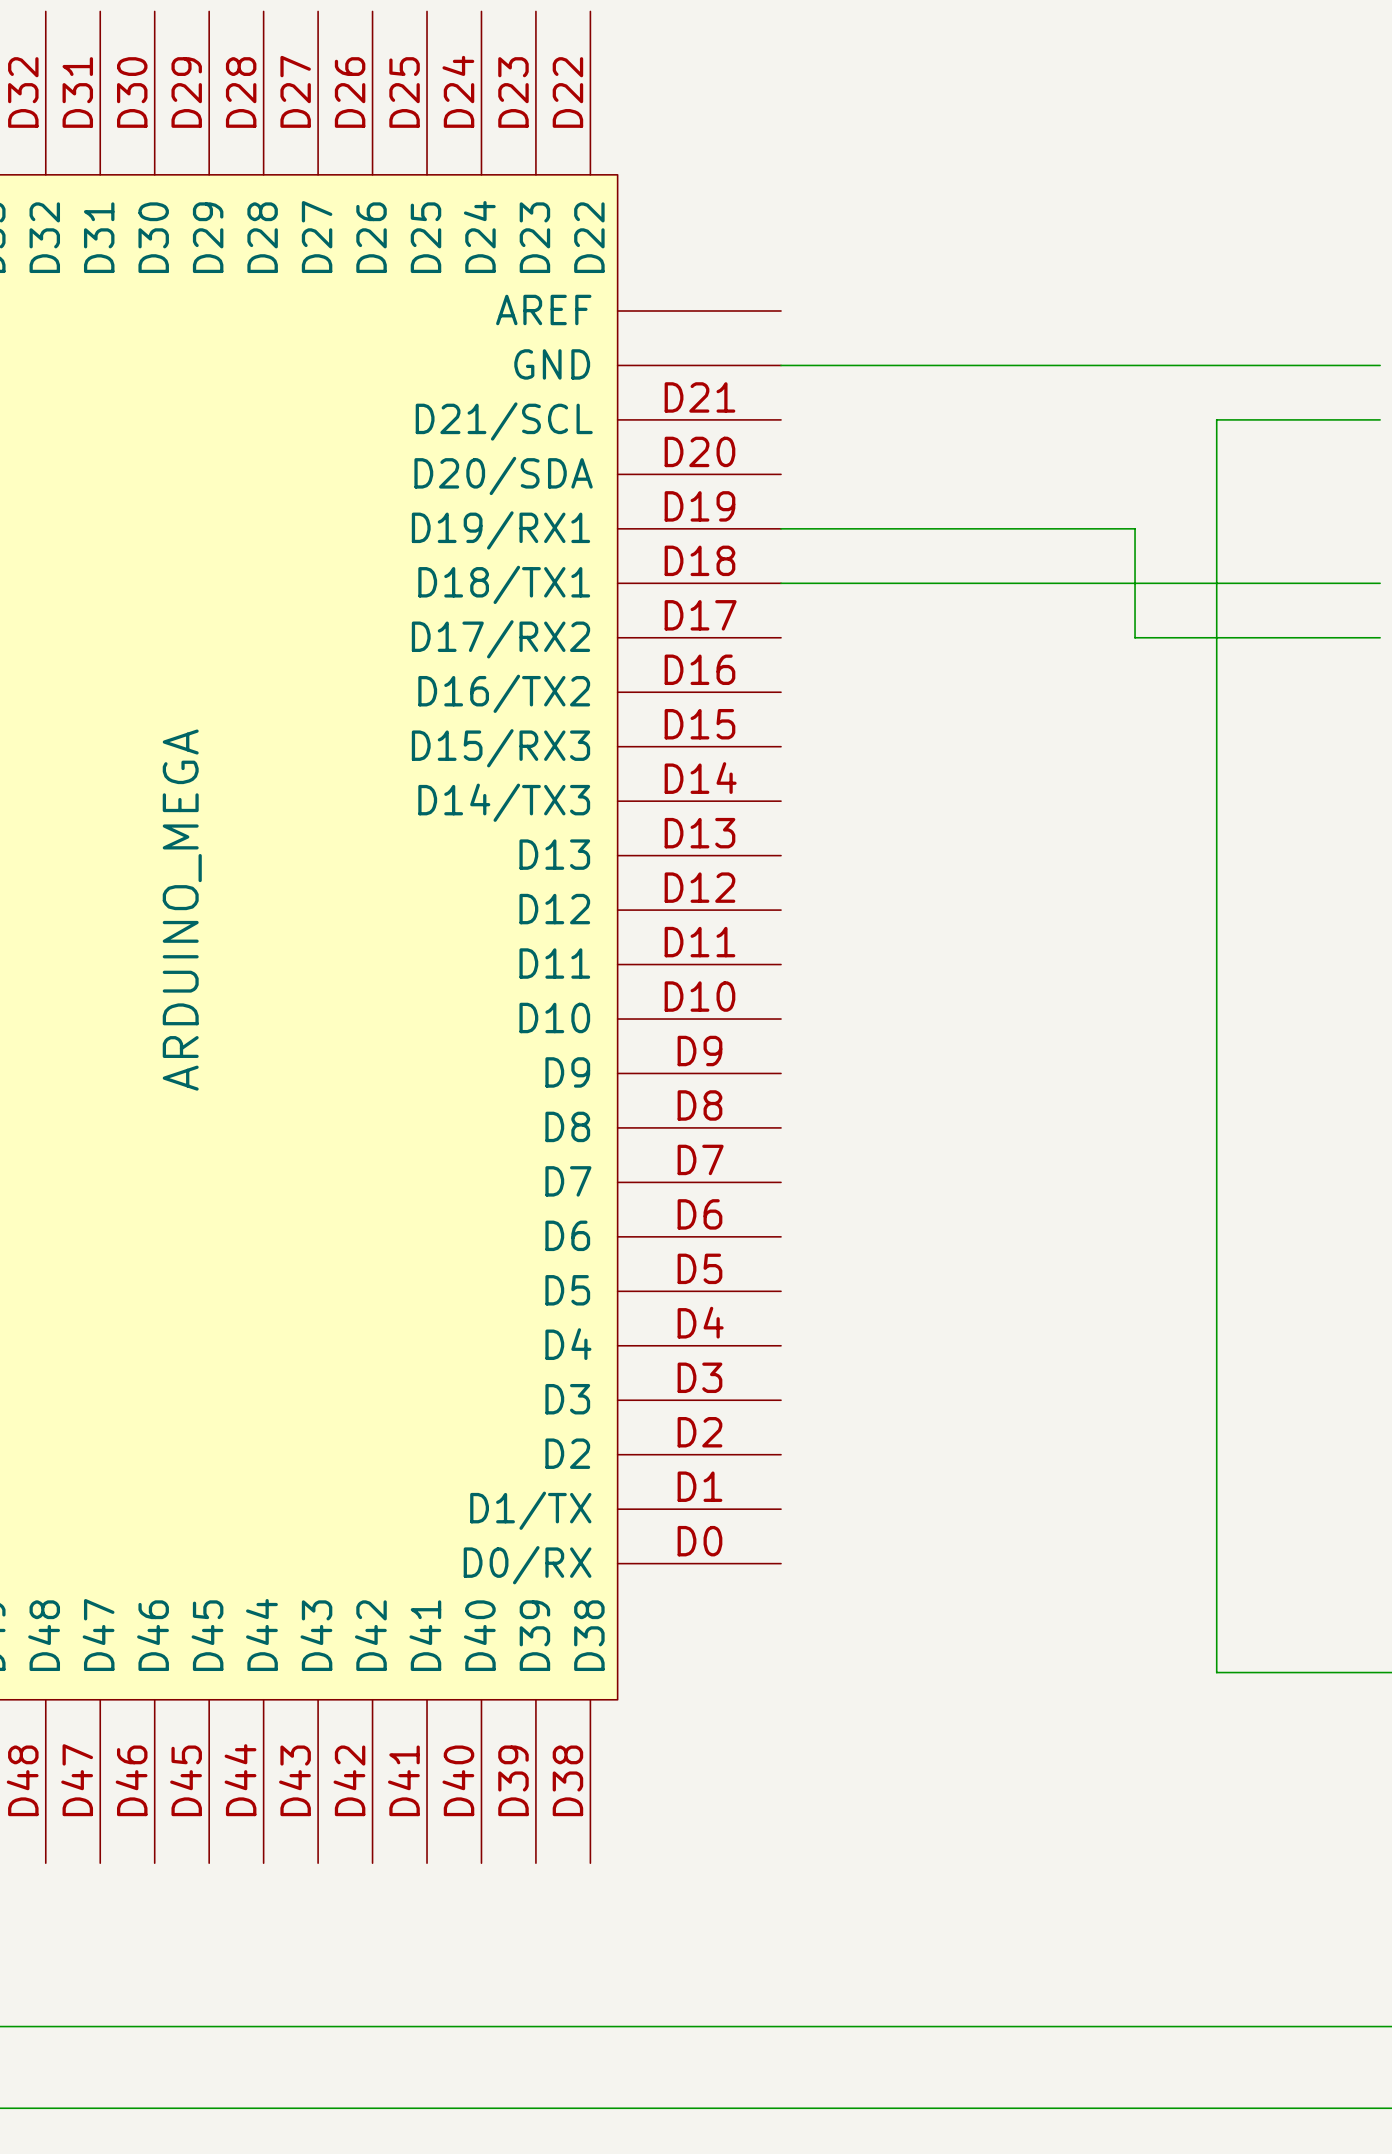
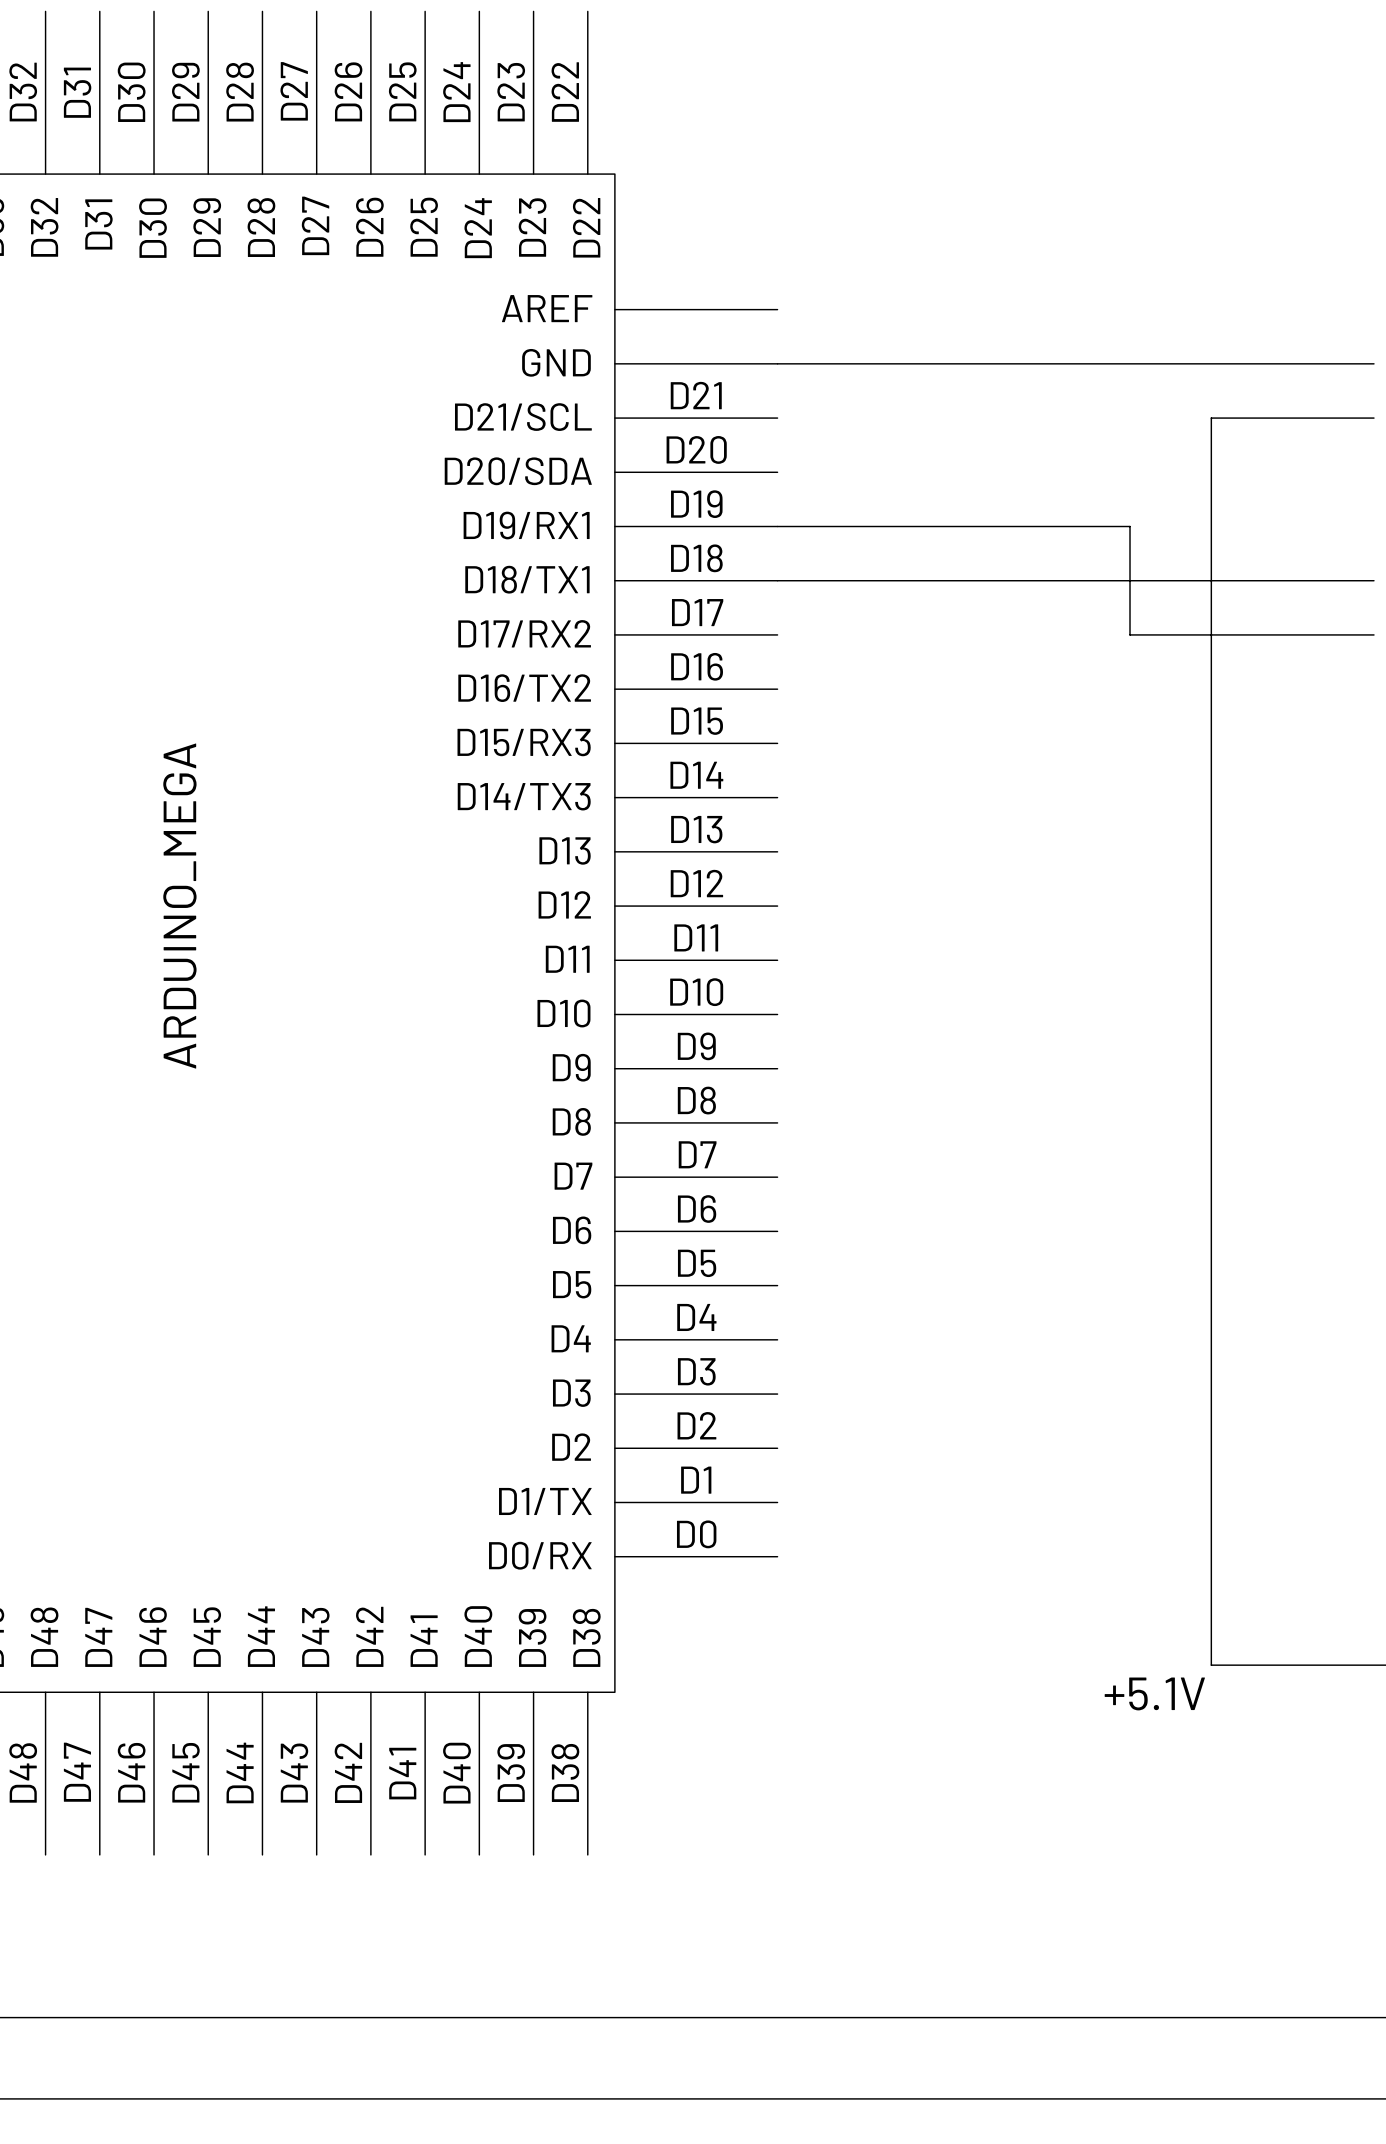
text: none -> +5.1V (1154, 1693)

